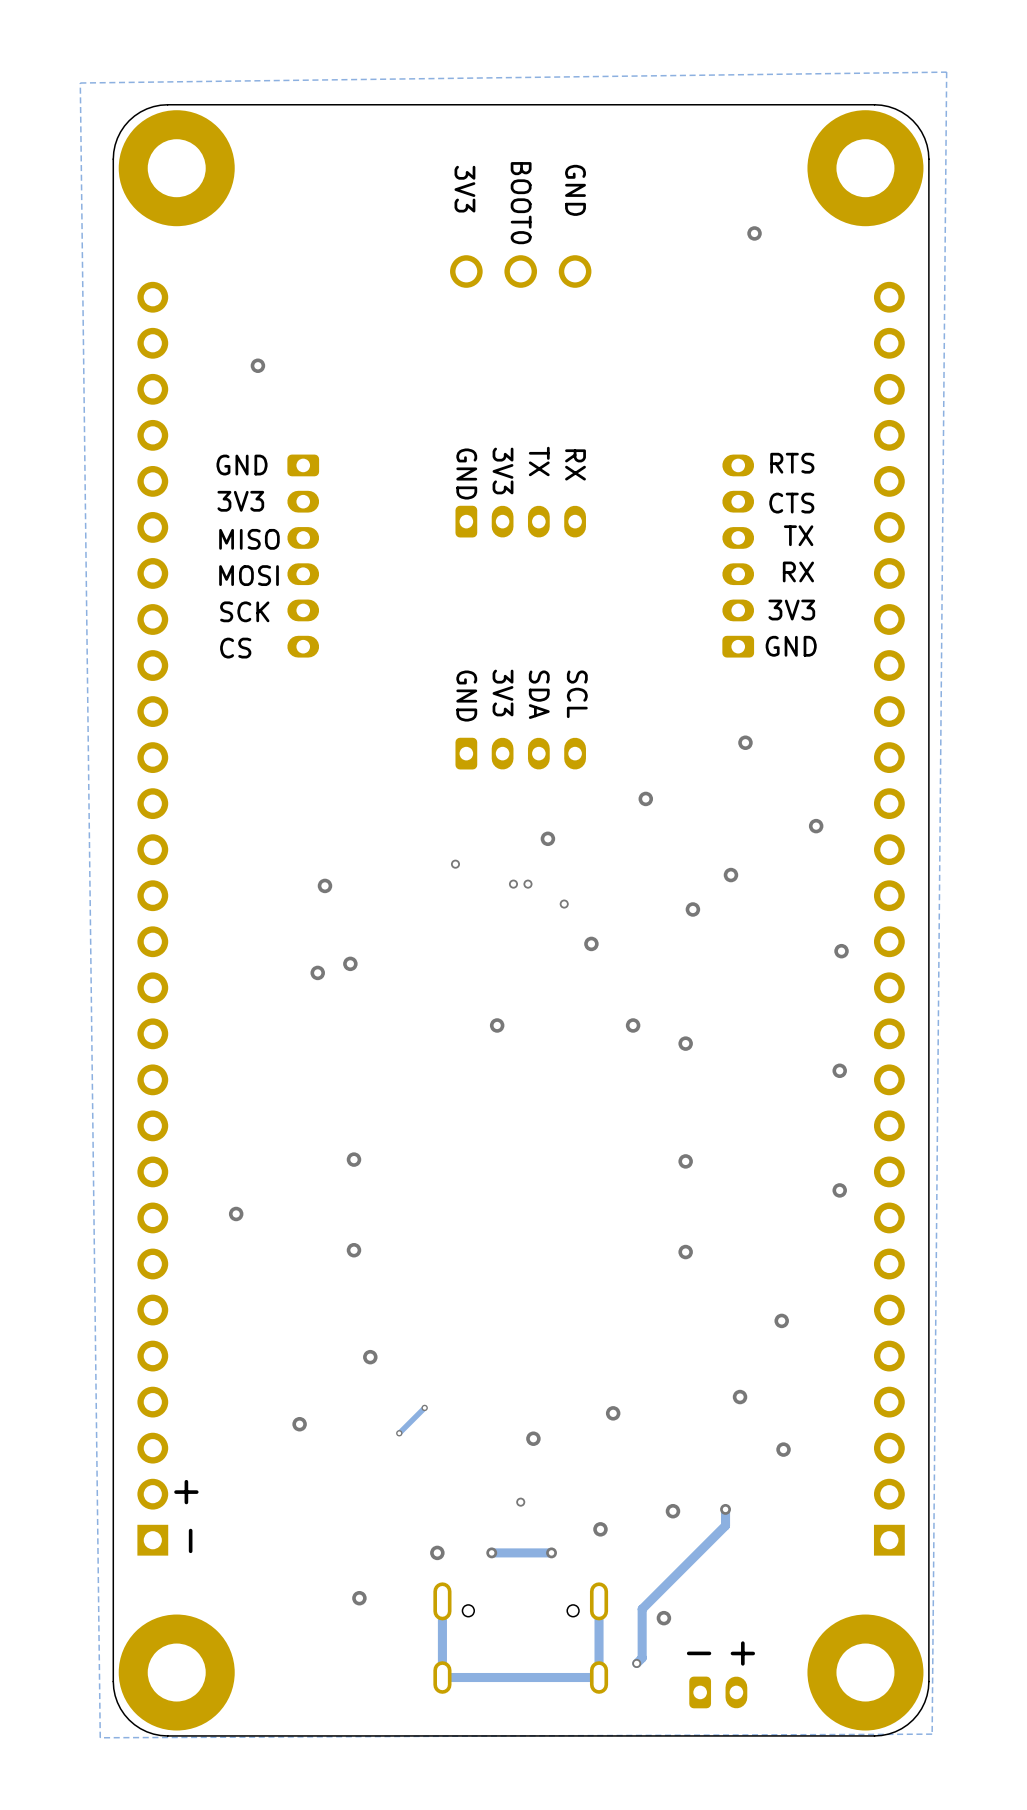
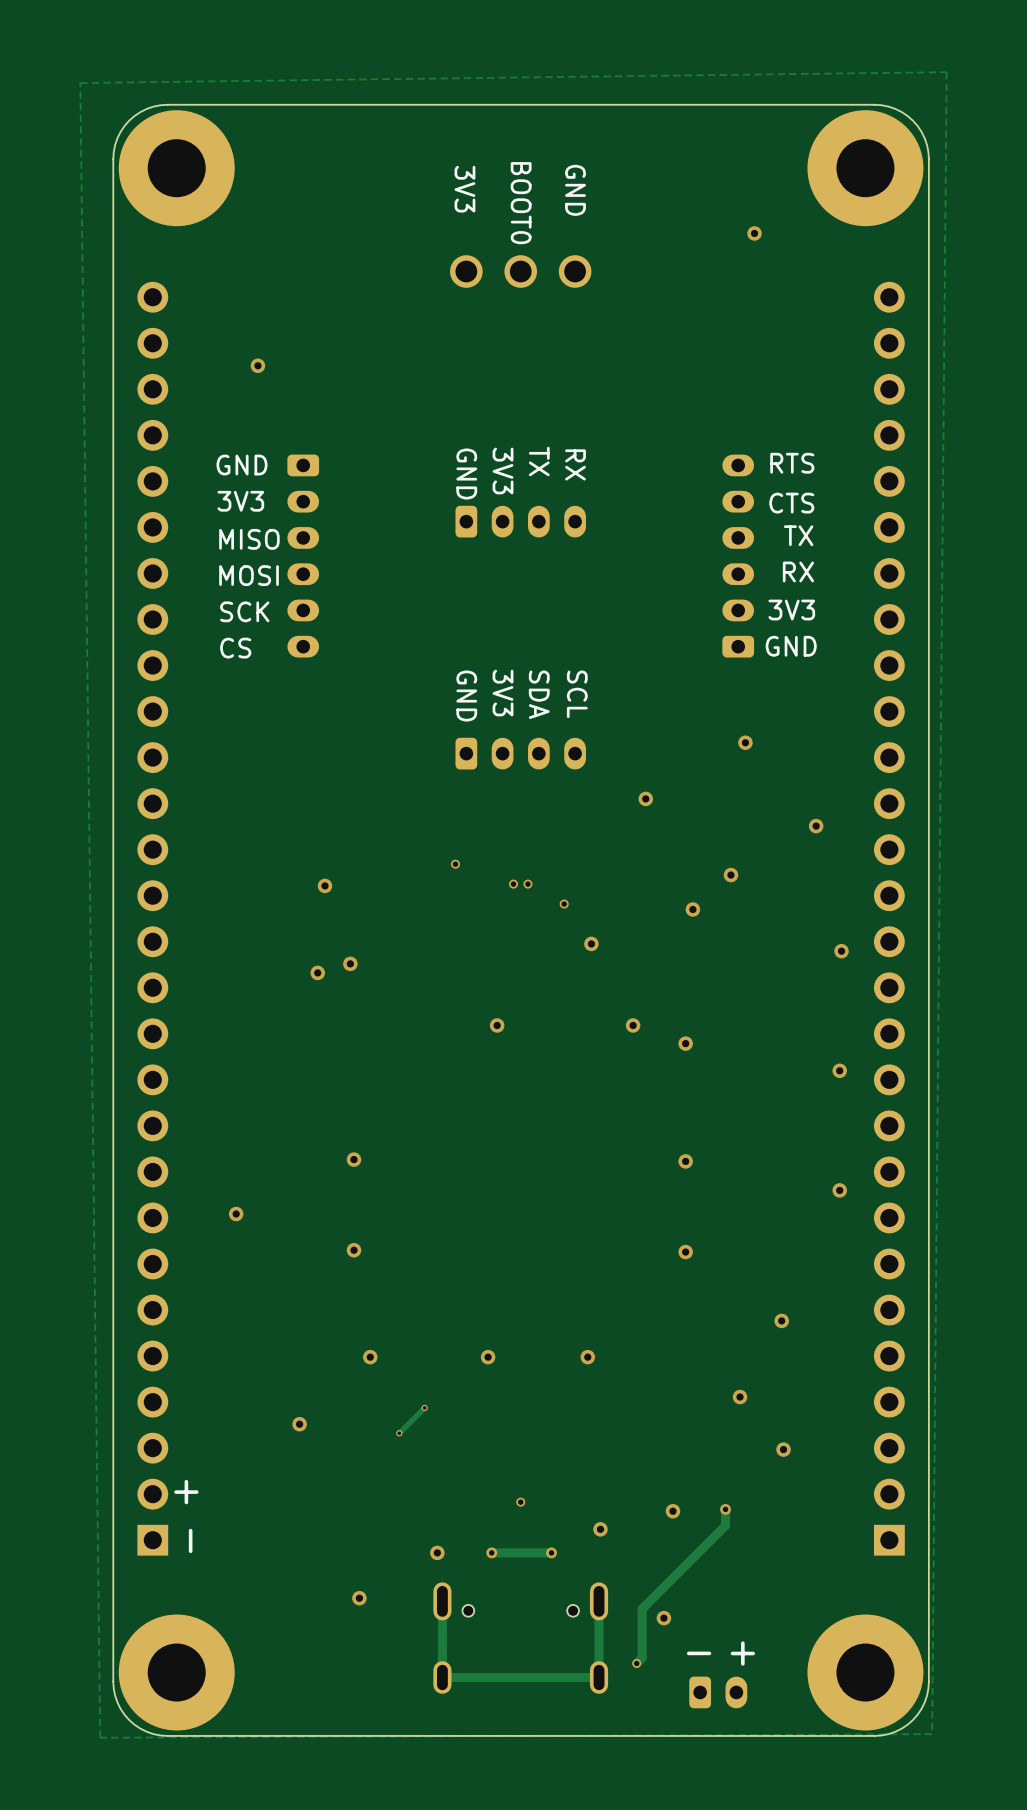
via: (547, 838) -> none
via: none -> (488, 1357)
via: none -> (587, 1357)
via: (613, 1413) -> none
via: (533, 1438) -> none

